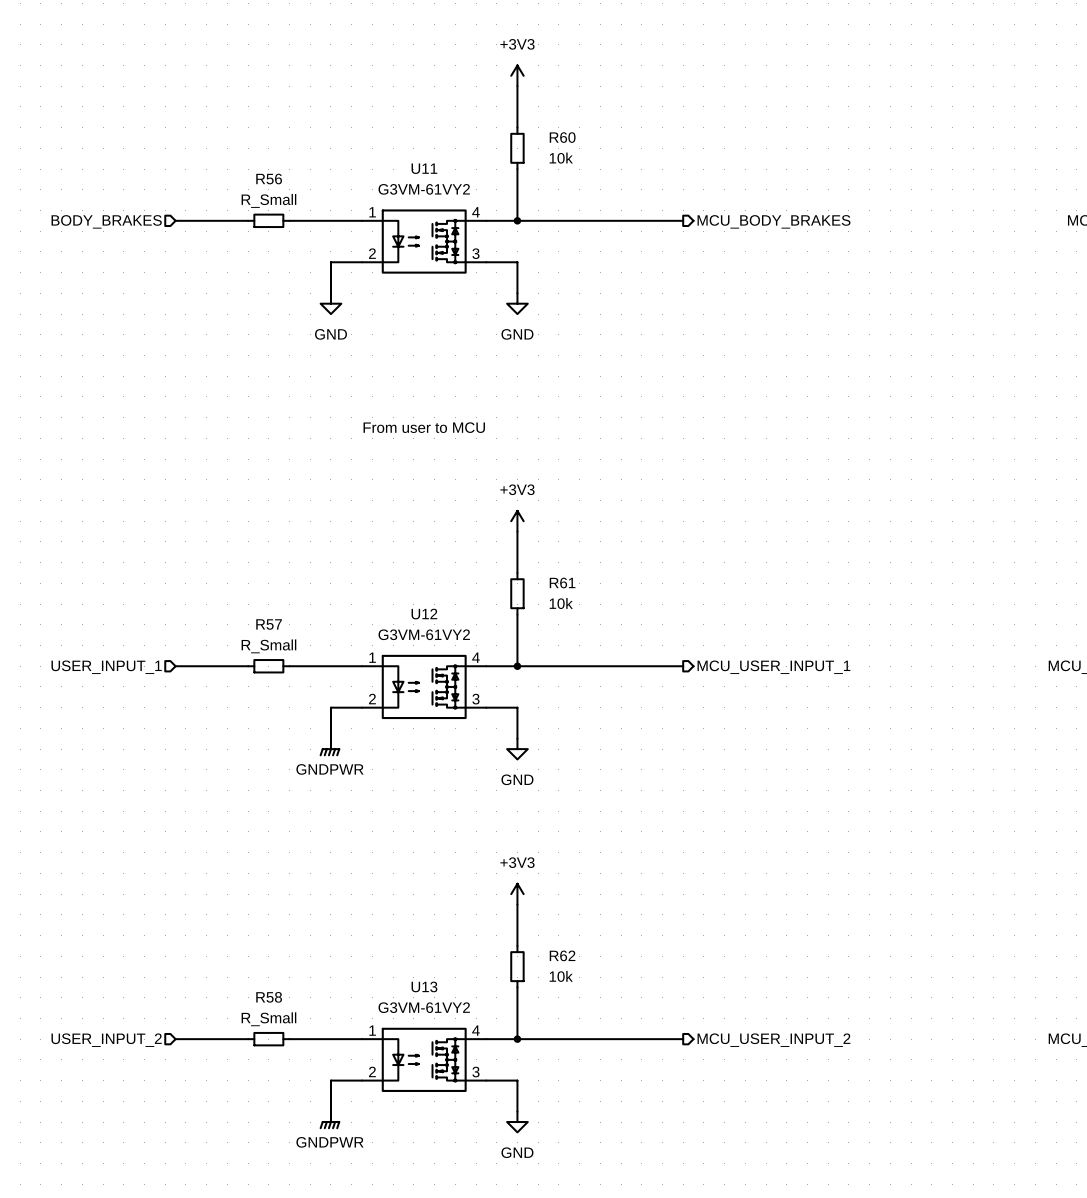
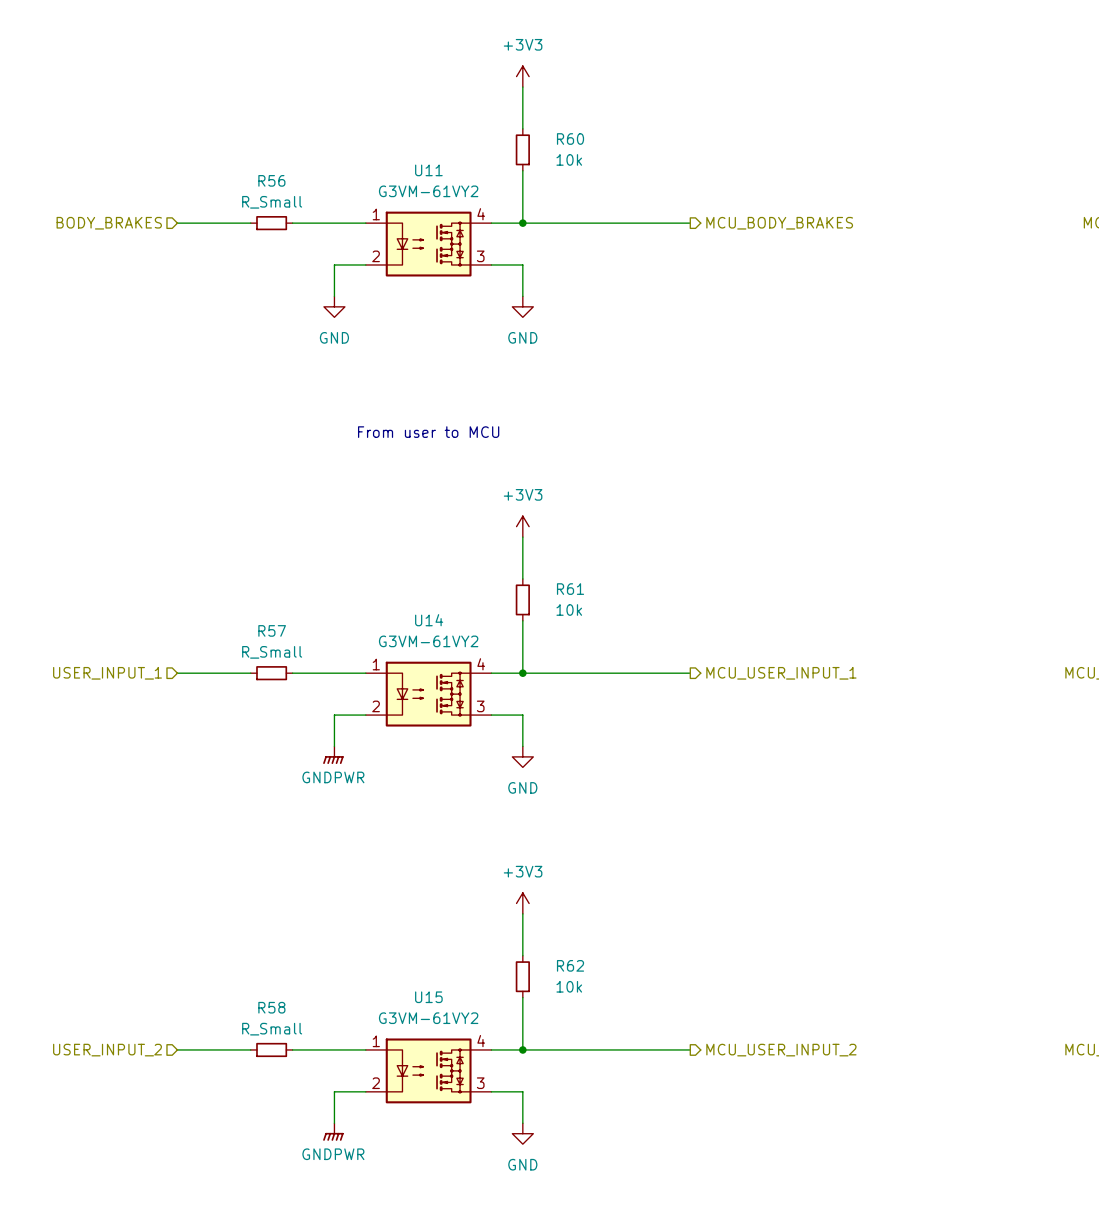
U12 name: U12 (424, 614) -> U14 (429, 620)
U13 name: U13 (424, 986) -> U15 (428, 997)

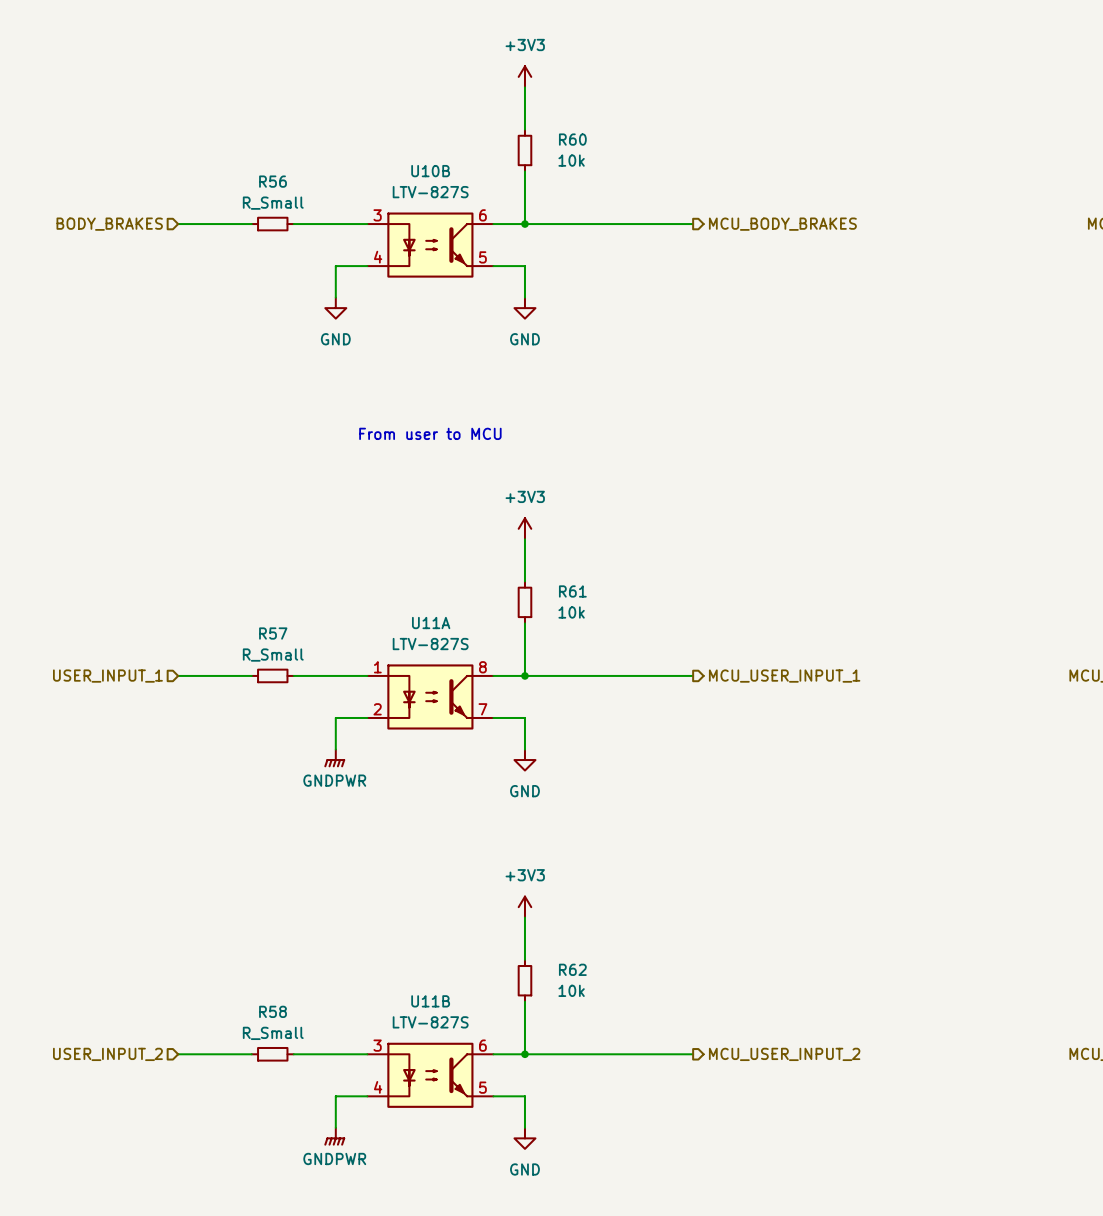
U11: G3VM-61VY2 (428, 244) -> none
U10B: none -> LTV-827S (430, 245)
U14: G3VM-61VY2 (428, 694) -> none
U11A: none -> LTV-827S (430, 696)
U15: G3VM-61VY2 (428, 1070) -> none
U11B: none -> LTV-827S (430, 1075)

